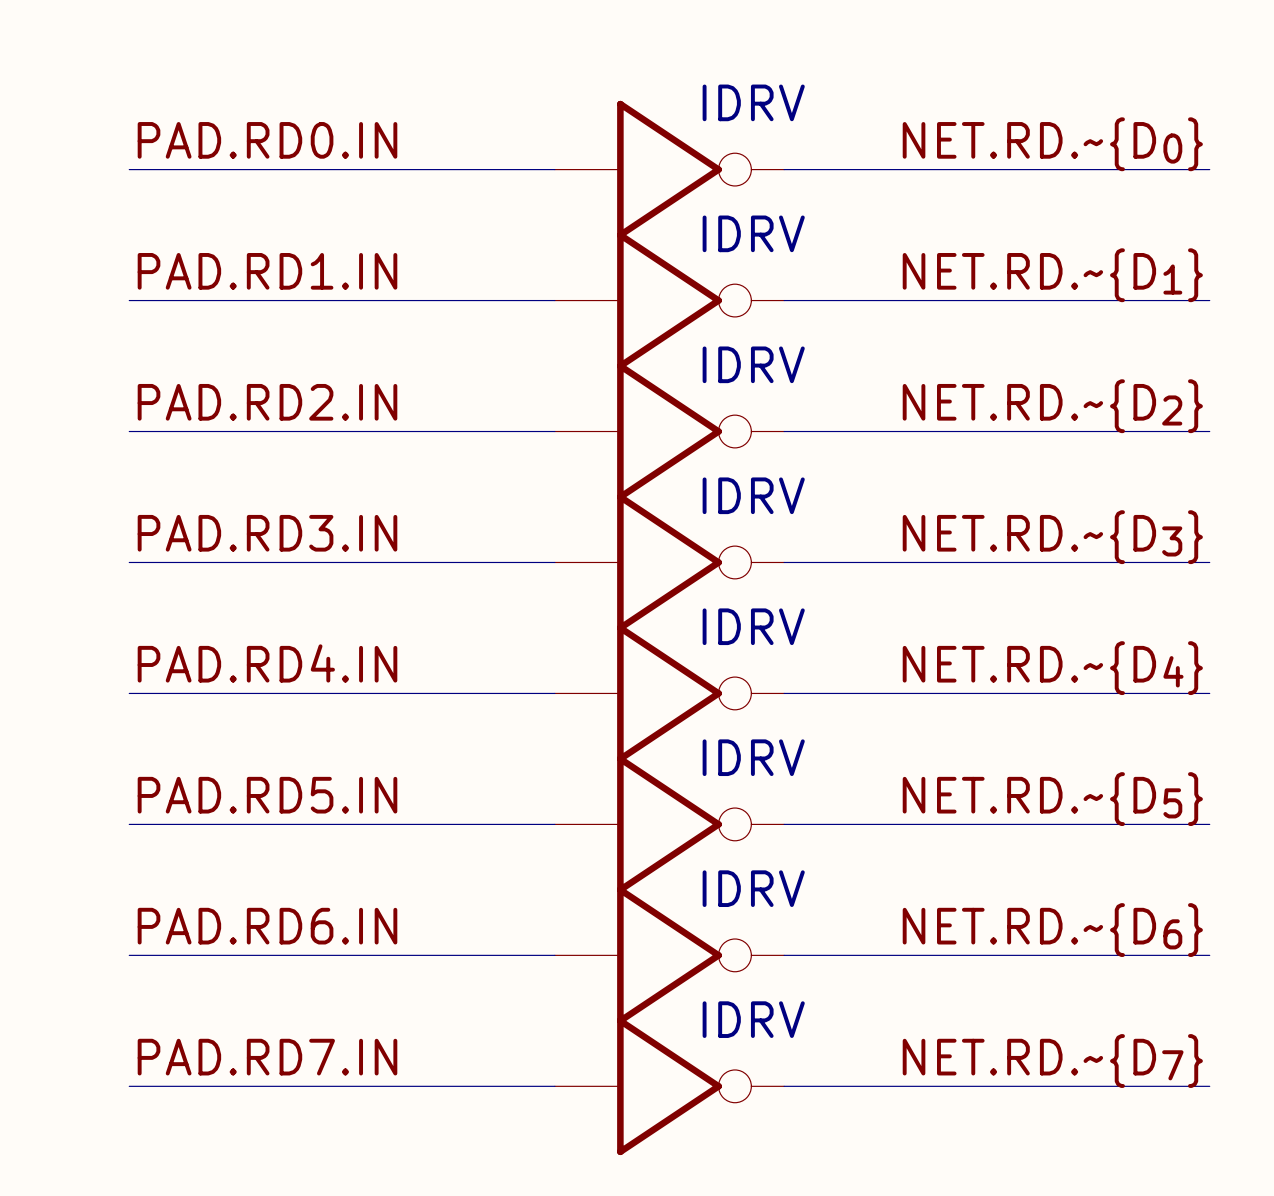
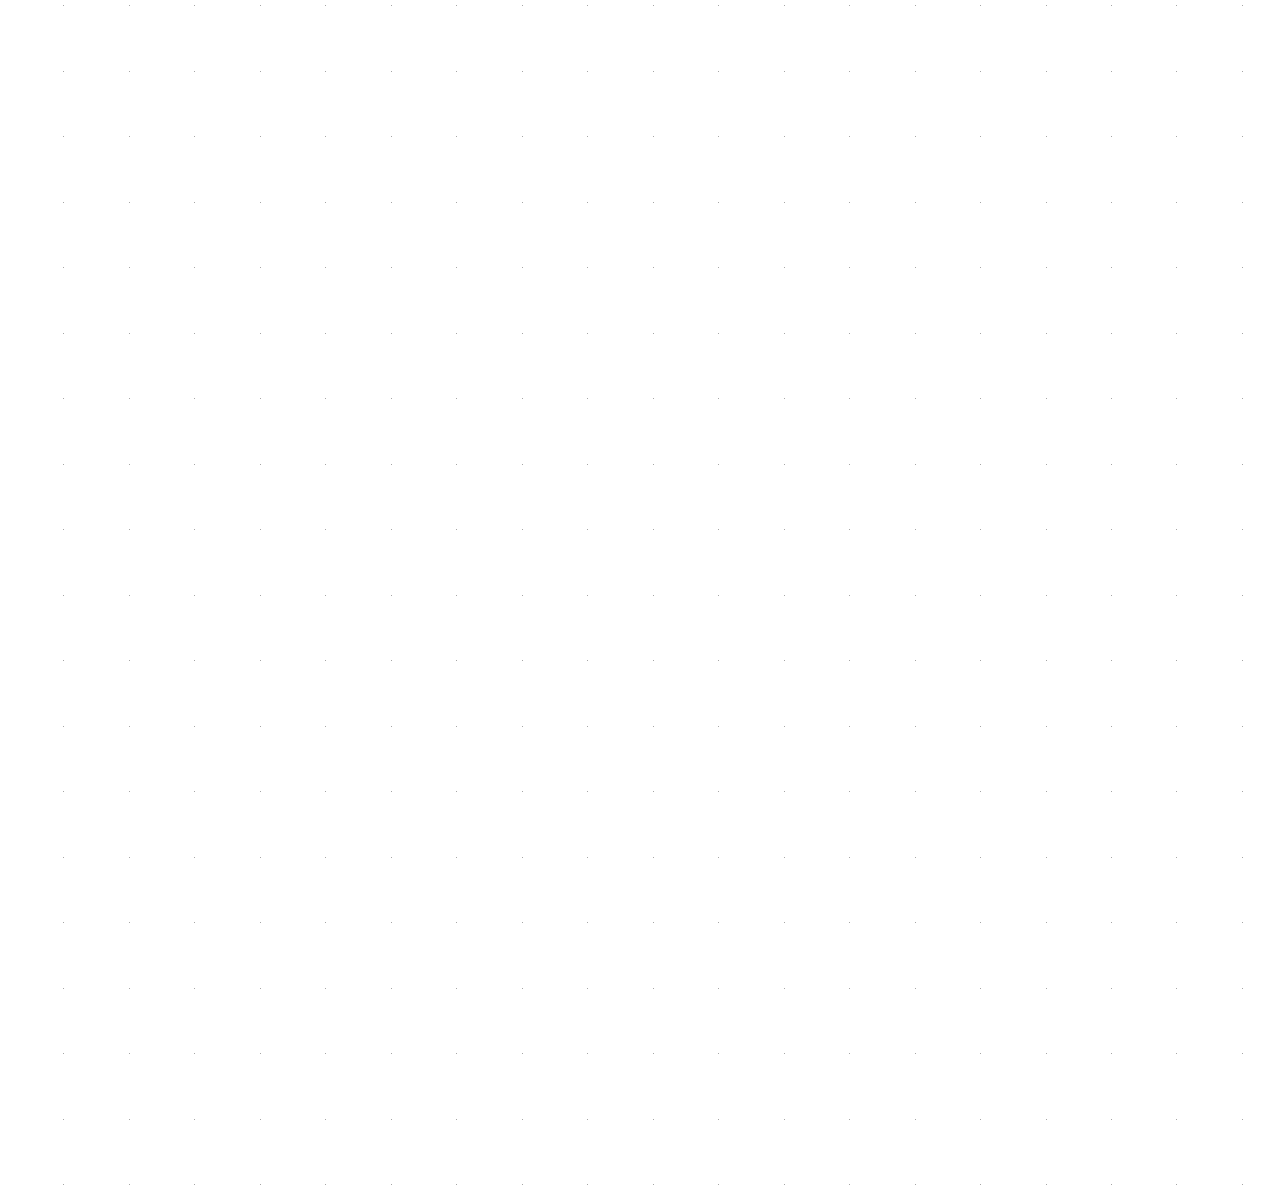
label: PAD.RD0.IN (267, 140) -> none
label: NET.RD.~{D0} (1052, 144) -> none
wire: (129, 169) (554, 169) -> none
part: IDRV (669, 169) -> none
wire: (784, 169) (1209, 169) -> none
label: PAD.RD1.IN (267, 271) -> none
label: NET.RD.~{D1} (1052, 275) -> none
wire: (129, 300) (554, 300) -> none
part: IDRV (669, 300) -> none
wire: (784, 300) (1209, 300) -> none
label: PAD.RD2.IN (267, 402) -> none
label: NET.RD.~{D2} (1052, 406) -> none
wire: (129, 431) (554, 431) -> none
part: IDRV (669, 431) -> none
wire: (784, 431) (1209, 431) -> none
label: PAD.RD3.IN (267, 533) -> none
label: NET.RD.~{D3} (1052, 537) -> none
wire: (129, 562) (554, 562) -> none
part: IDRV (669, 562) -> none
wire: (784, 562) (1209, 562) -> none
label: PAD.RD4.IN (267, 663) -> none
label: NET.RD.~{D4} (1052, 668) -> none
wire: (129, 693) (554, 693) -> none
part: IDRV (669, 693) -> none
wire: (784, 693) (1209, 693) -> none
label: PAD.RD5.IN (267, 795) -> none
label: NET.RD.~{D5} (1052, 799) -> none
wire: (129, 824) (554, 824) -> none
part: IDRV (669, 824) -> none
wire: (784, 824) (1209, 824) -> none
label: PAD.RD6.IN (267, 926) -> none
label: NET.RD.~{D6} (1052, 930) -> none
wire: (129, 955) (554, 955) -> none
part: IDRV (669, 955) -> none
wire: (784, 955) (1209, 955) -> none
label: PAD.RD7.IN (267, 1057) -> none
label: NET.RD.~{D7} (1052, 1061) -> none
wire: (129, 1086) (554, 1086) -> none
part: IDRV (669, 1086) -> none
wire: (784, 1086) (1209, 1086) -> none

